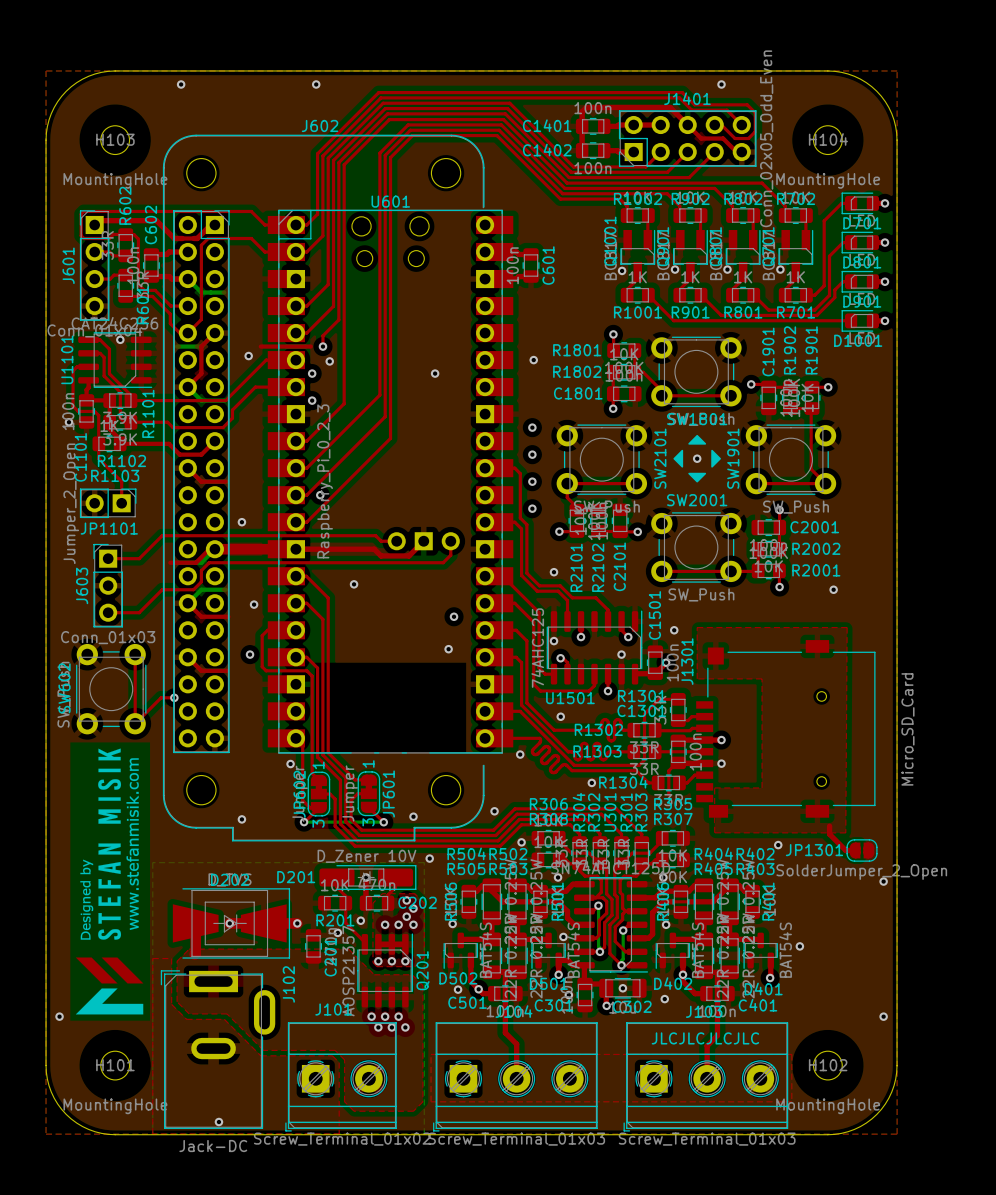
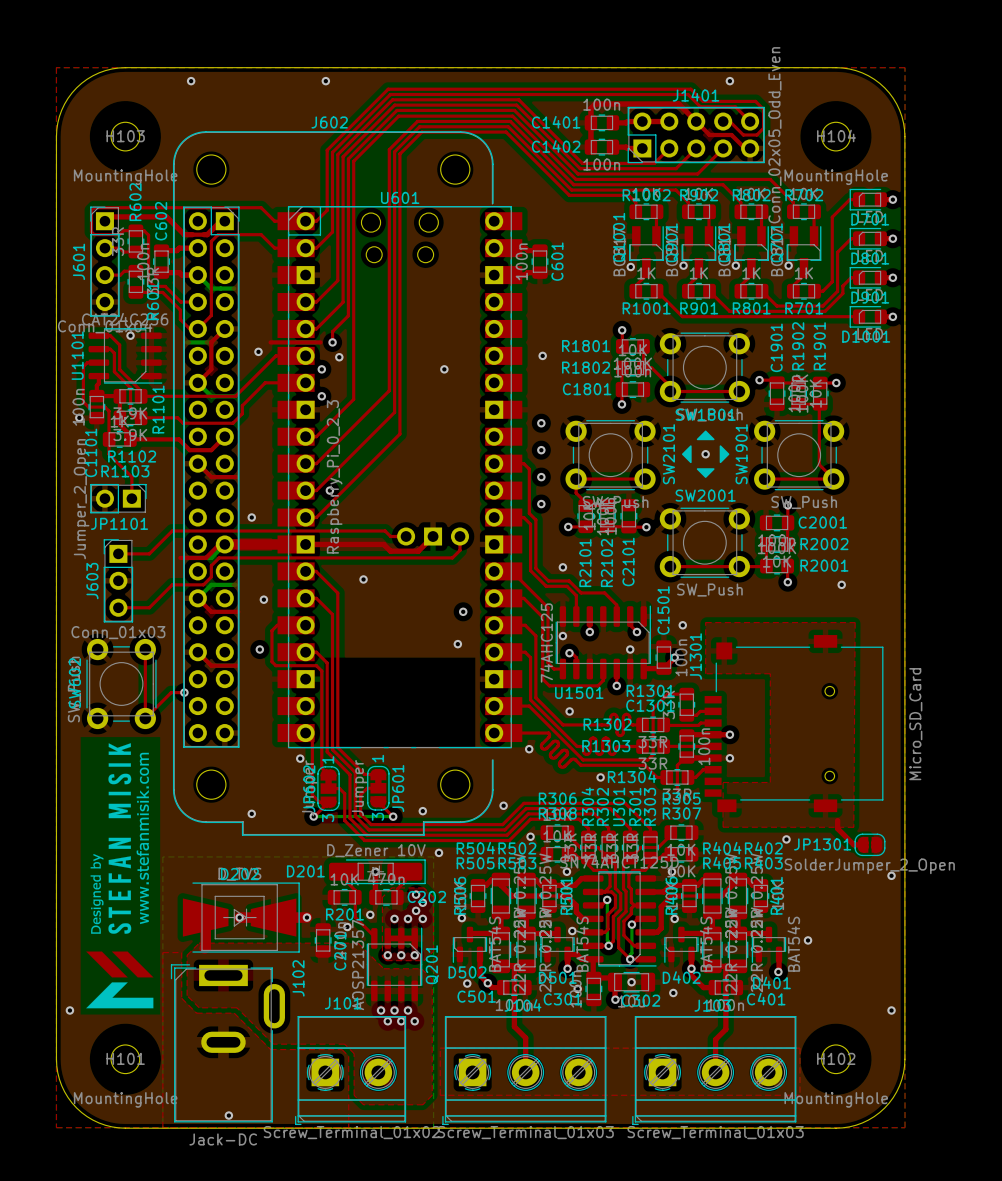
text: JLCJLCJLCJLC (705, 1038) -> none

